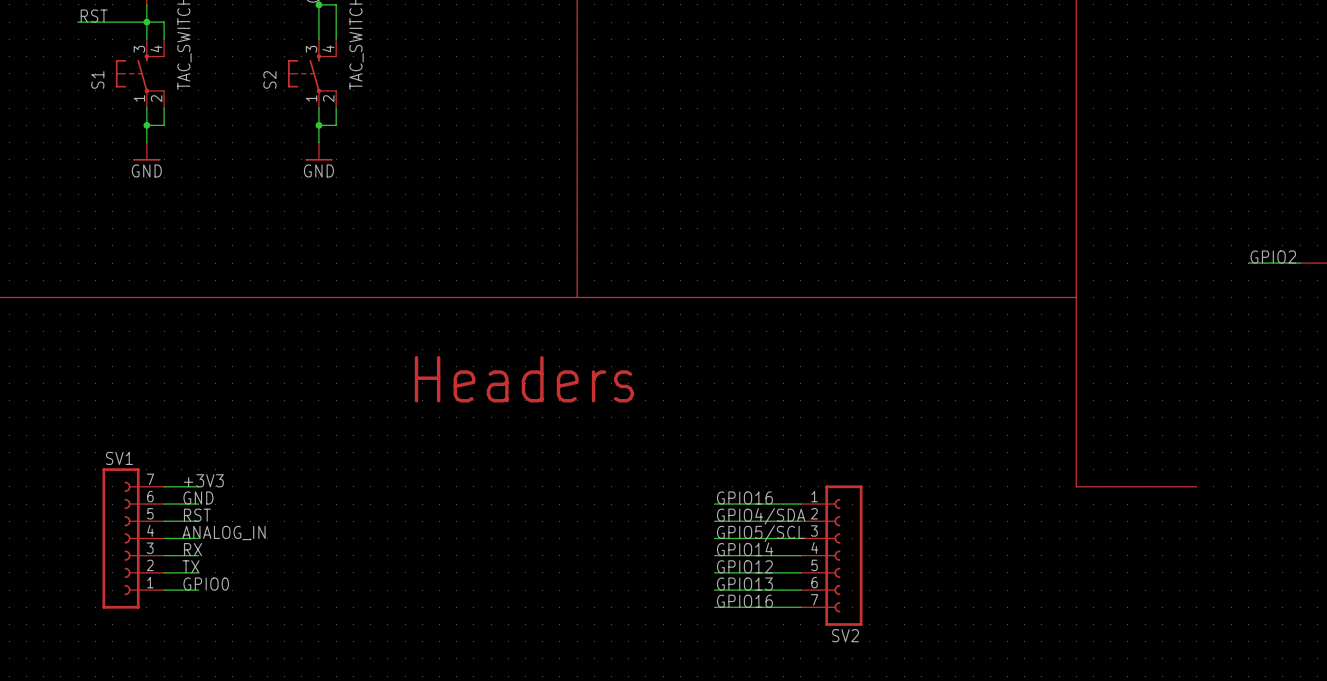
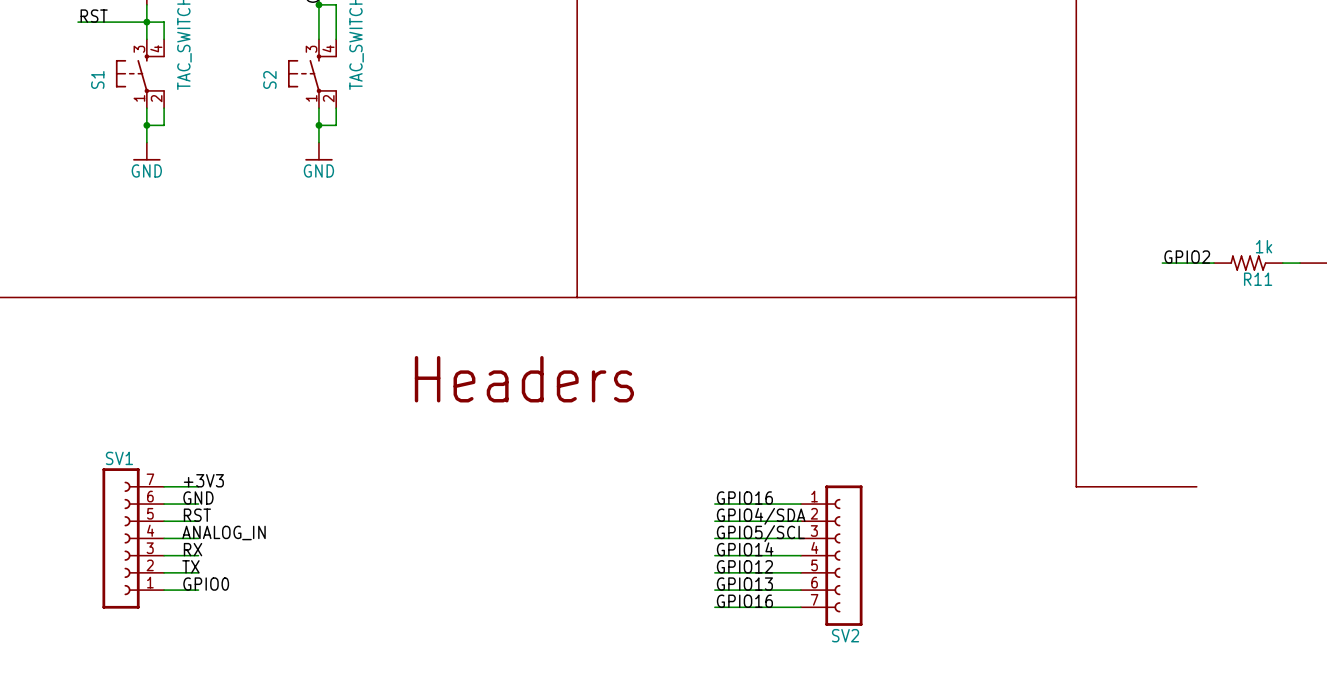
label position: GPIO2 (1273, 257) -> GPIO2 (1187, 257)
wire: none -> (1162, 263) (1213, 263)
R11: none -> 1k (1248, 263)

